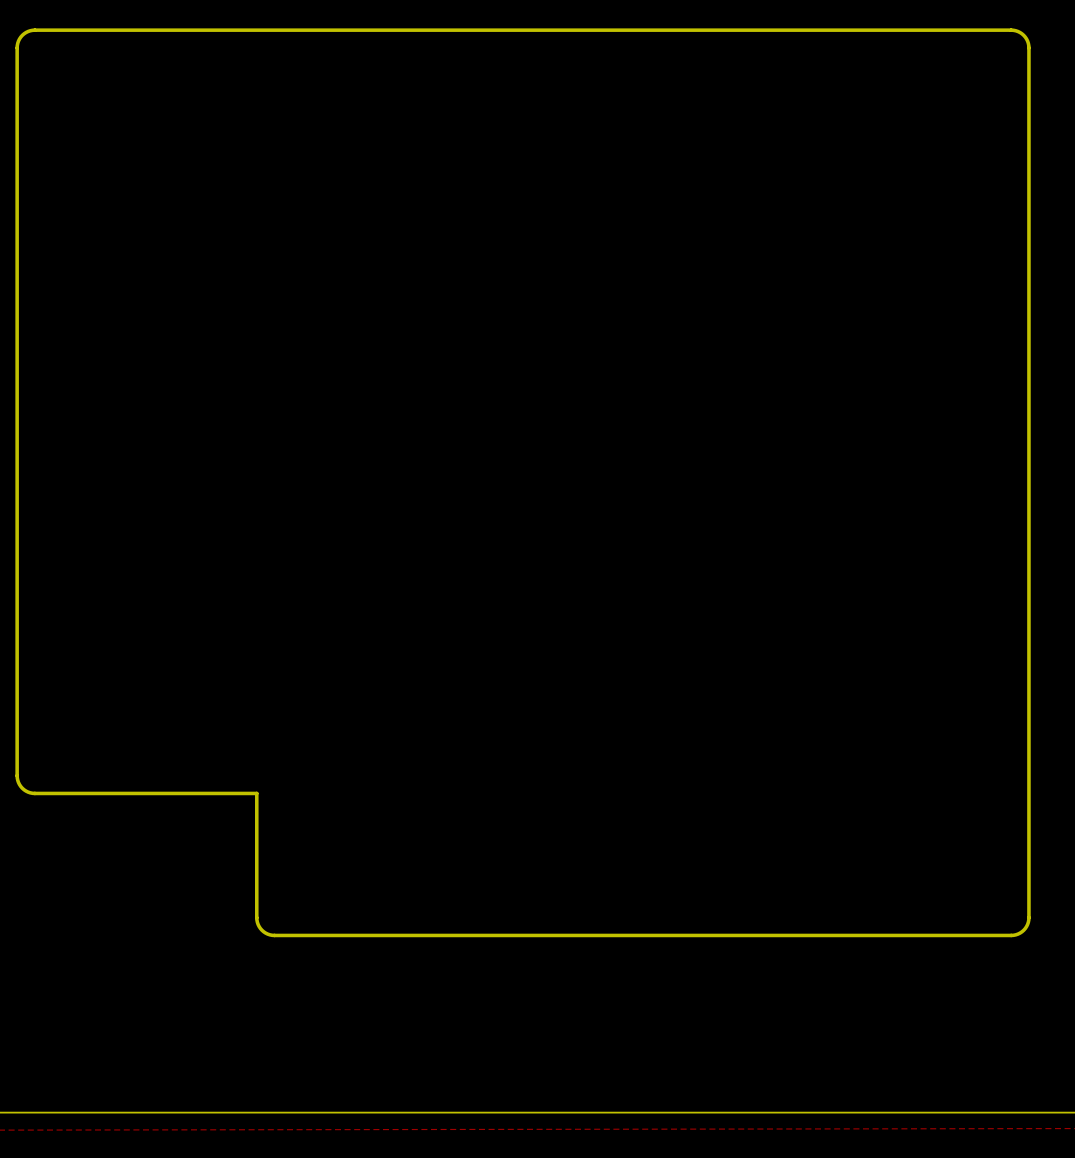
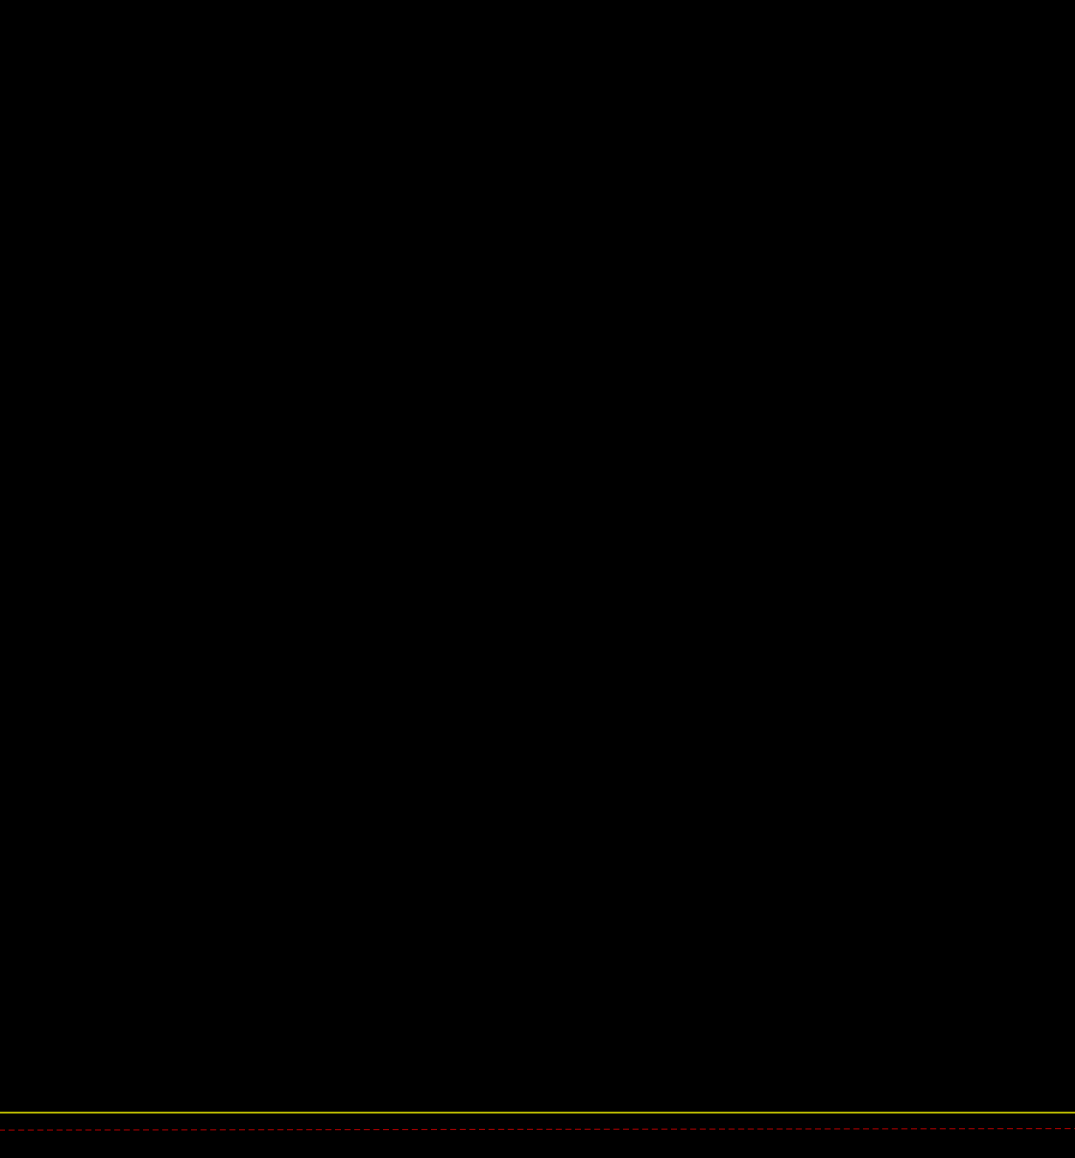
board edge: (34, 30) (1011, 30) (1023, 35) (1028, 47) (1028, 917) (1023, 930) (1011, 935) (272, 935) (261, 930) (256, 920) (256, 793) (34, 793) (22, 788) (17, 775) (17, 47) (22, 35) (34, 30) -> none

